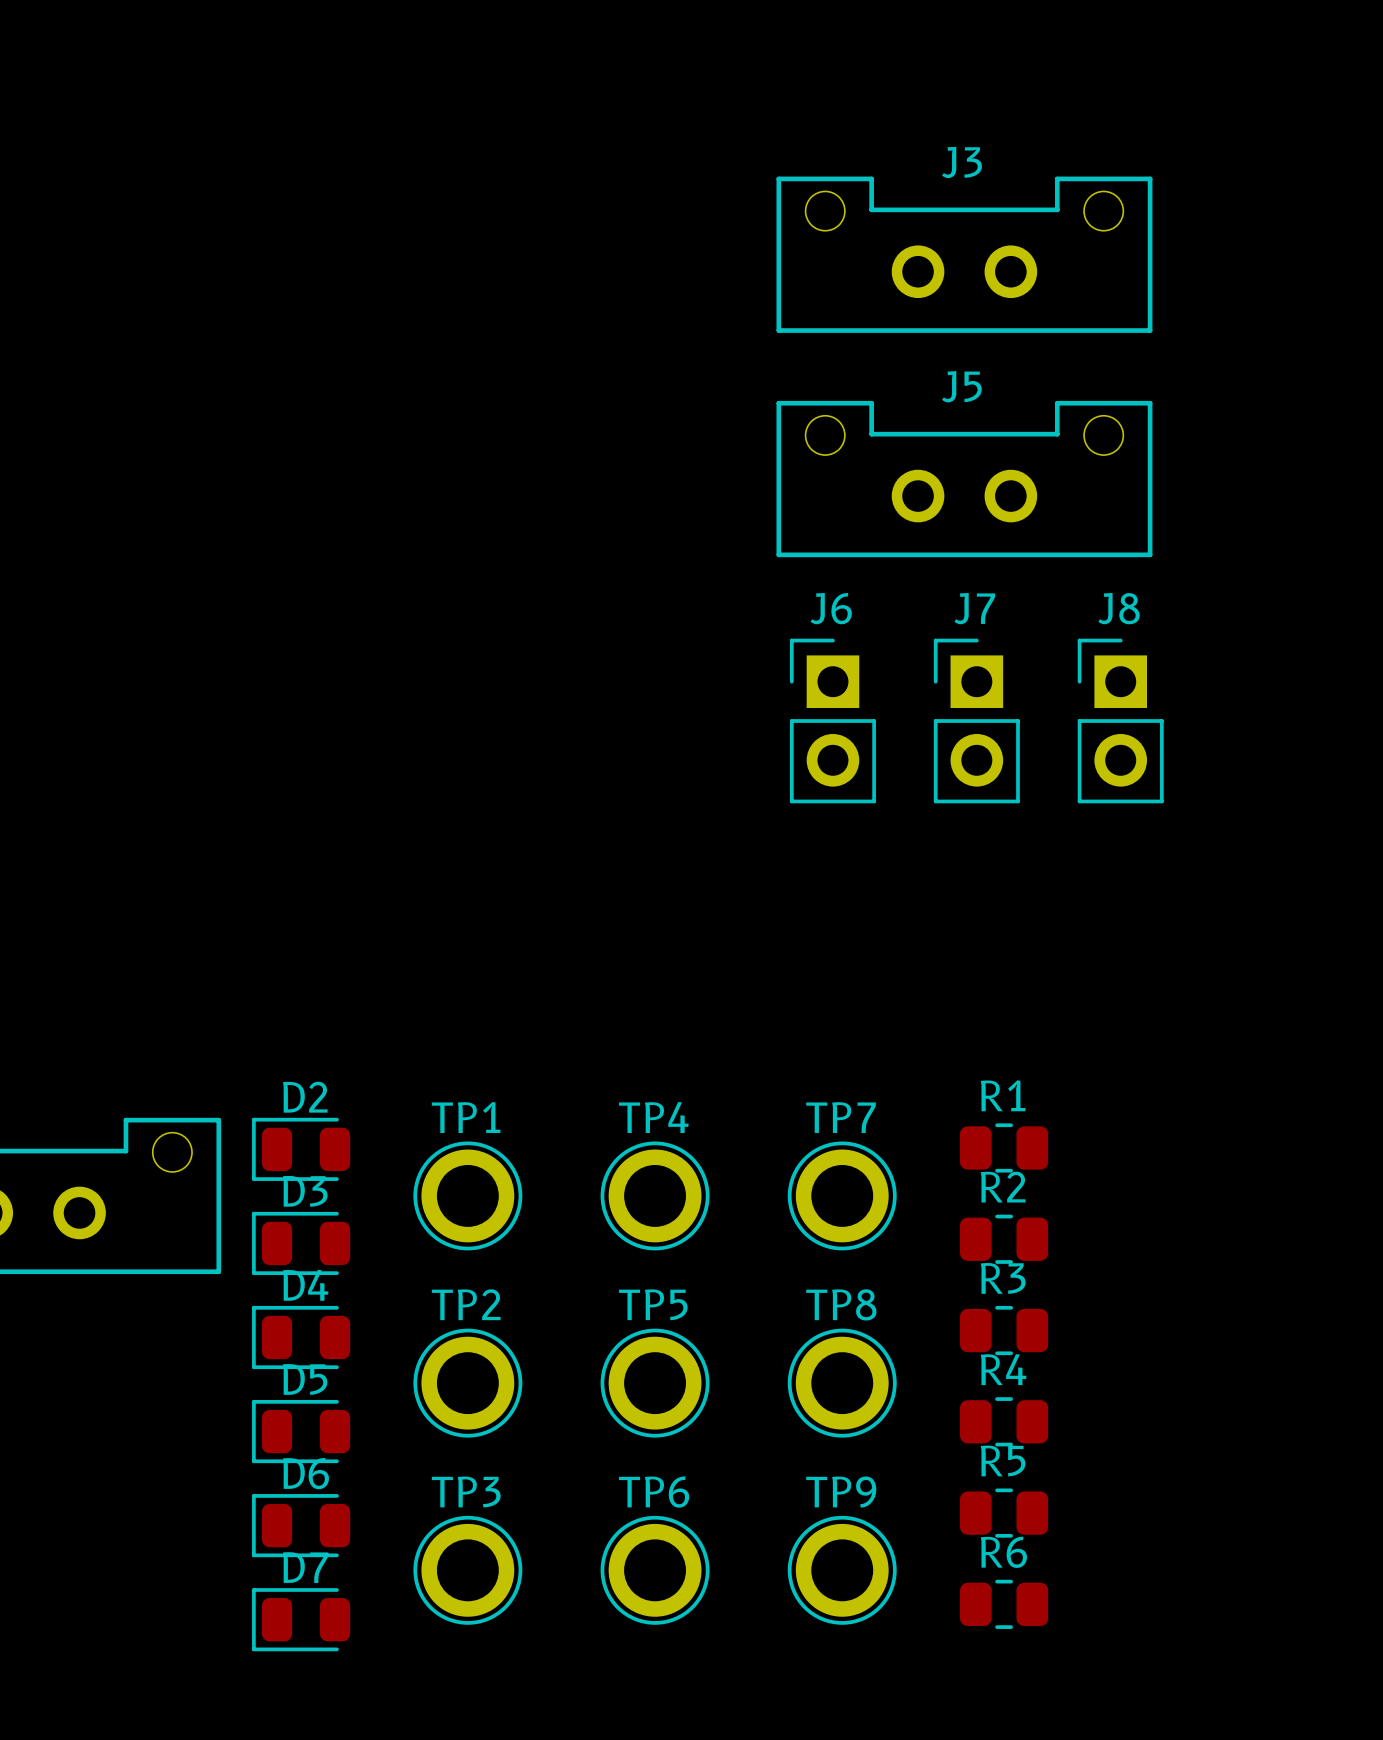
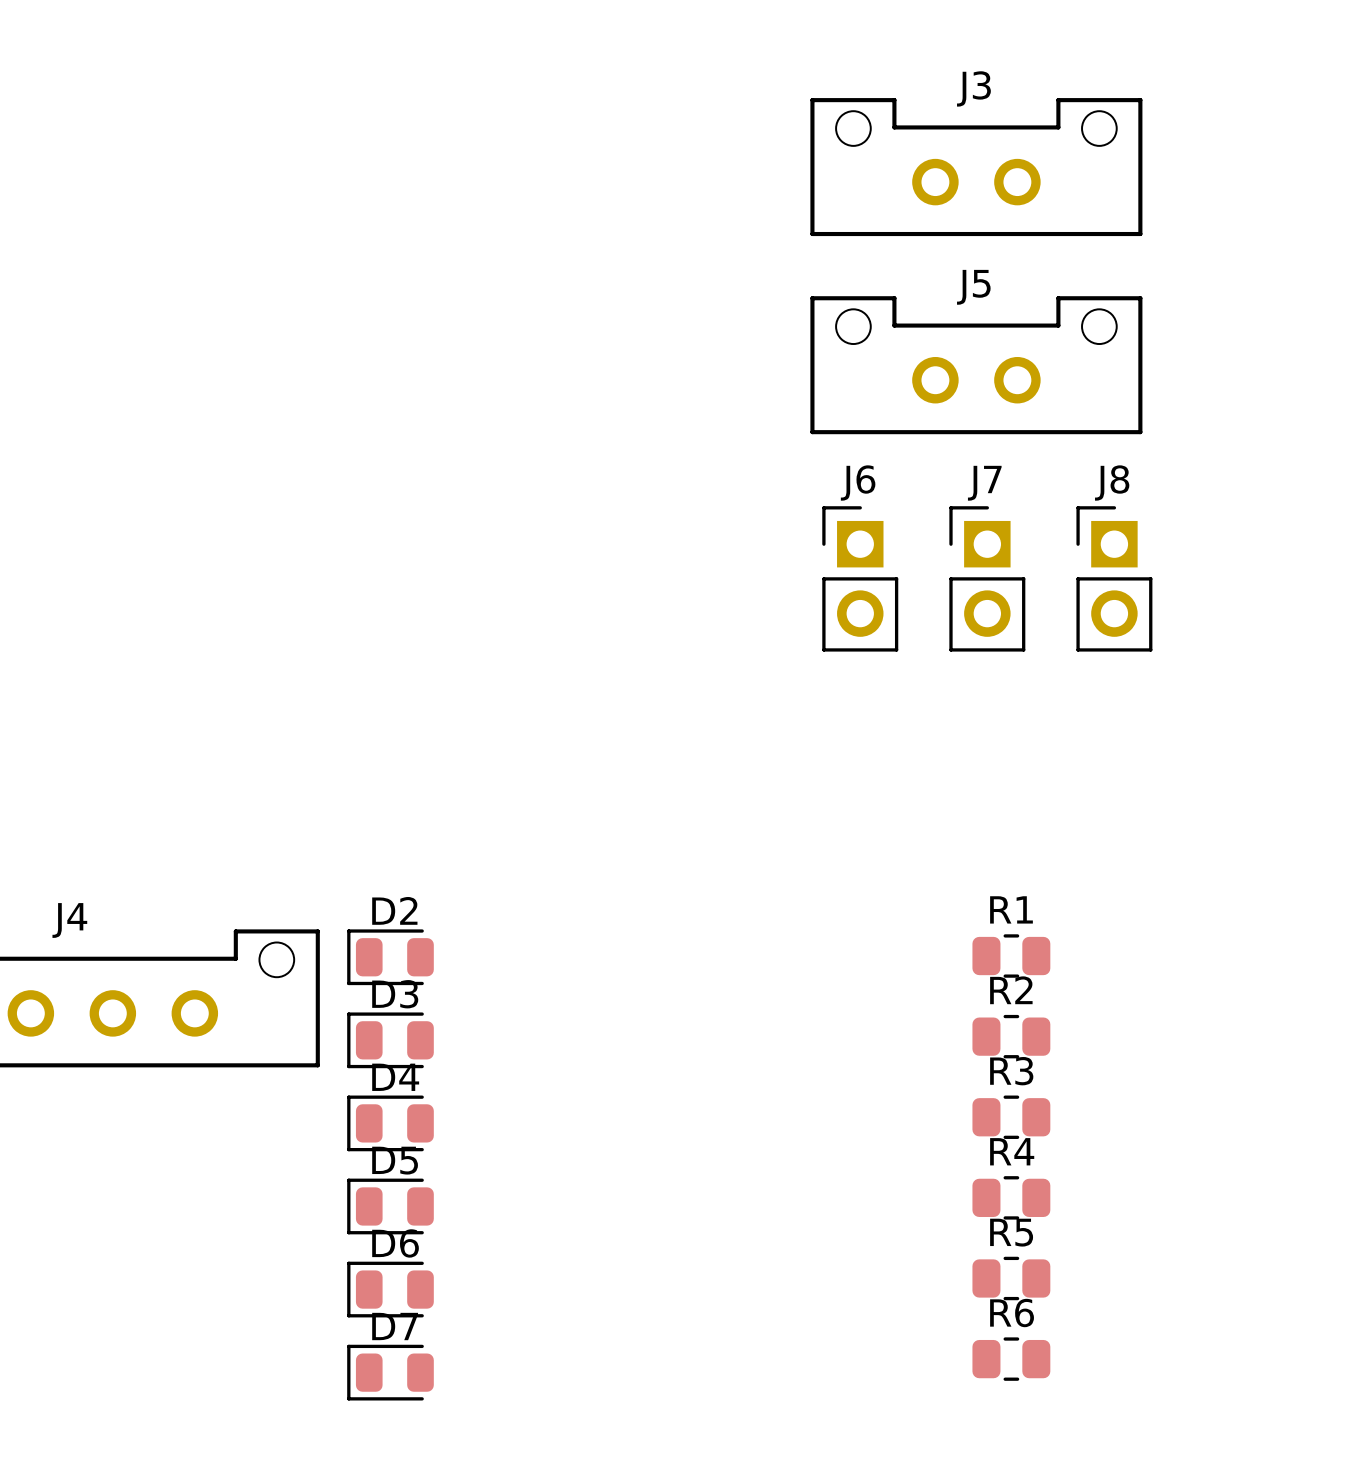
TP1: (467, 1195) -> none
TP4: (655, 1195) -> none
TP7: (842, 1195) -> none
TP2: (467, 1383) -> none
TP5: (655, 1383) -> none
TP8: (842, 1383) -> none
TP3: (467, 1570) -> none
TP6: (655, 1570) -> none
TP9: (842, 1570) -> none

